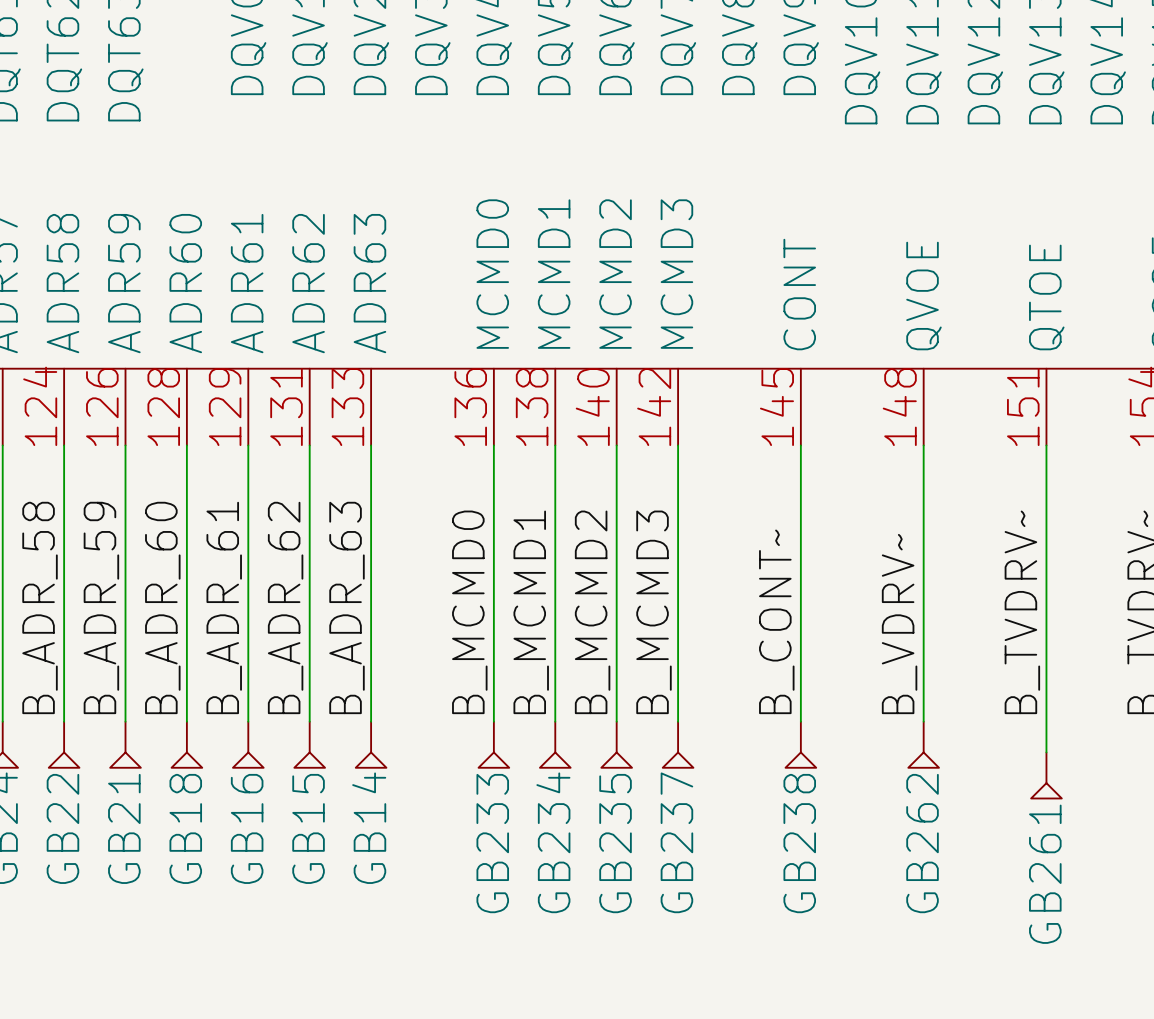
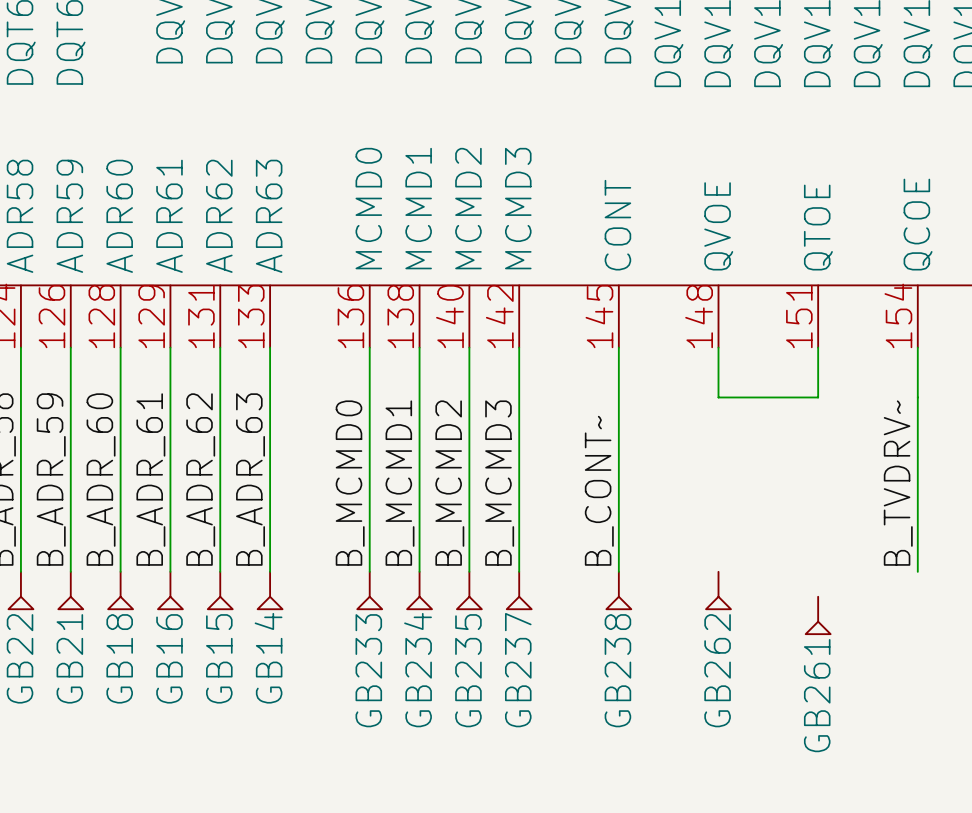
wire: (923, 506) (923, 721) -> (718, 397) (818, 397)
wire: (1046, 506) (1046, 752) -> none
label: B_TVDRV~ (1022, 612) -> none
label: B_VDRV~ (899, 624) -> none

